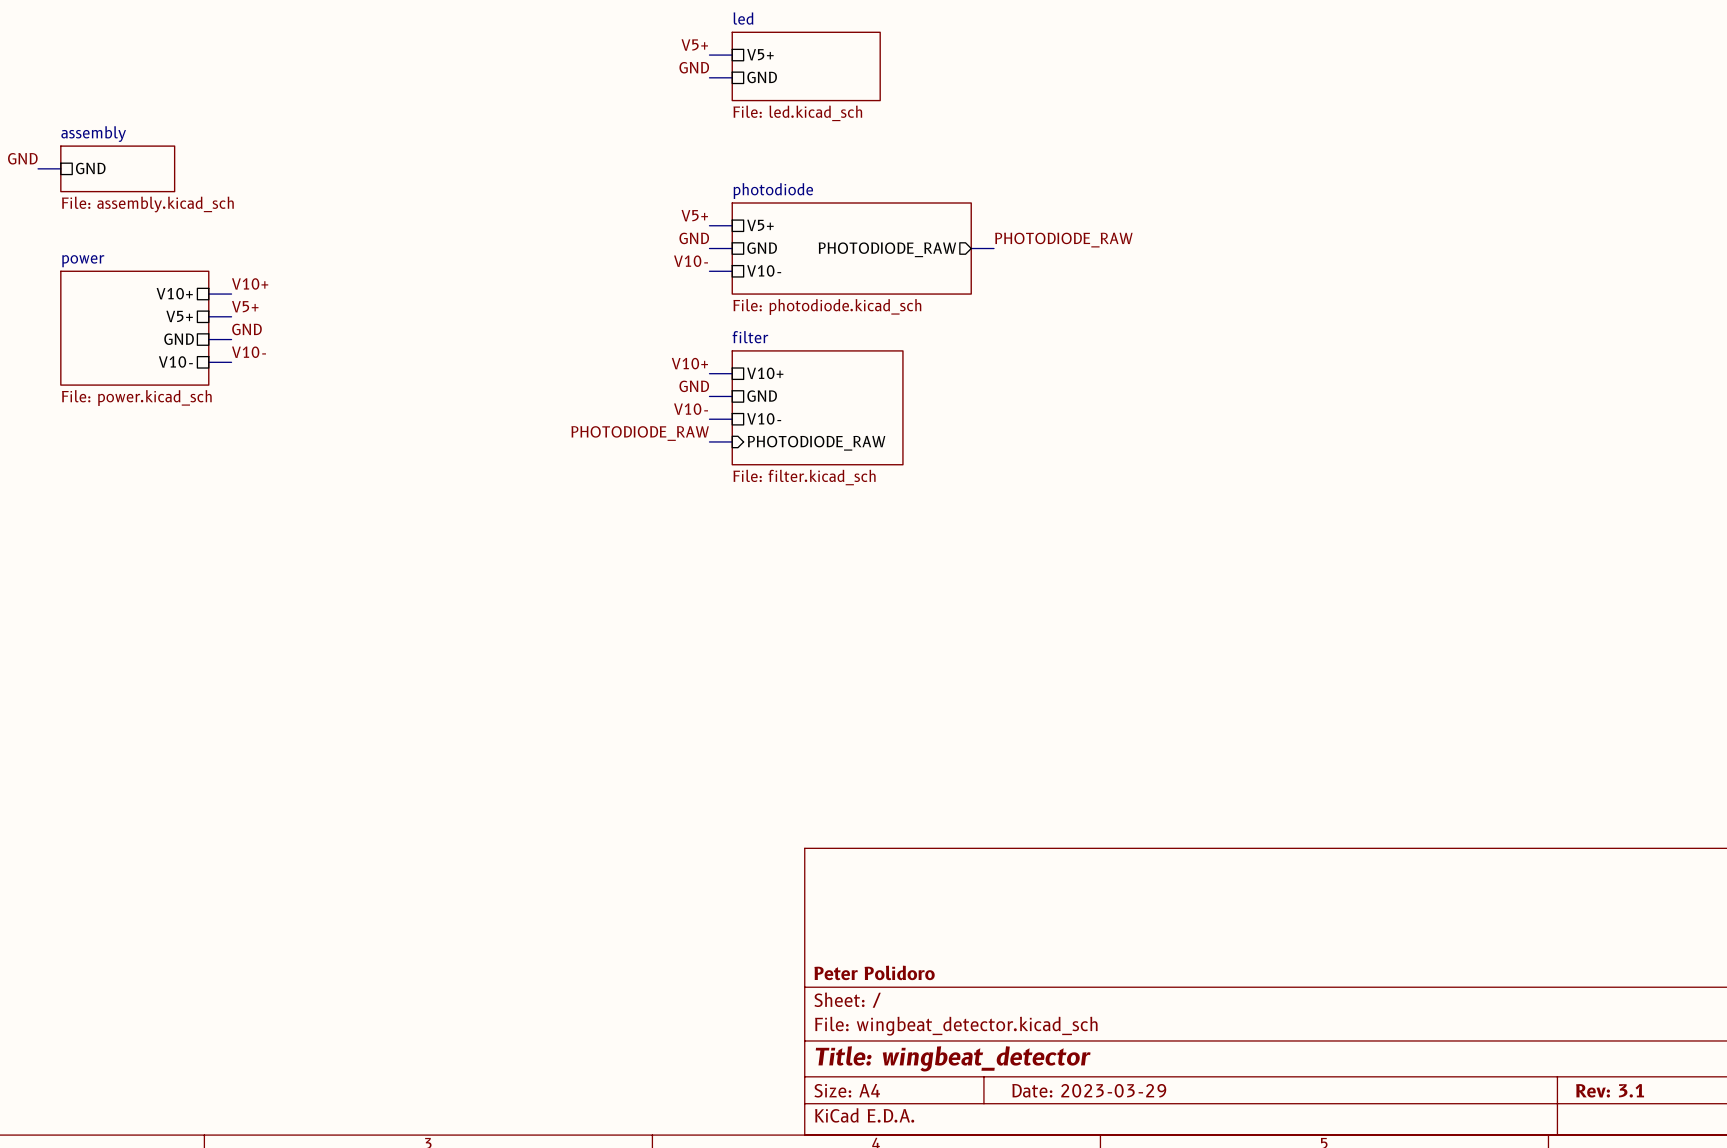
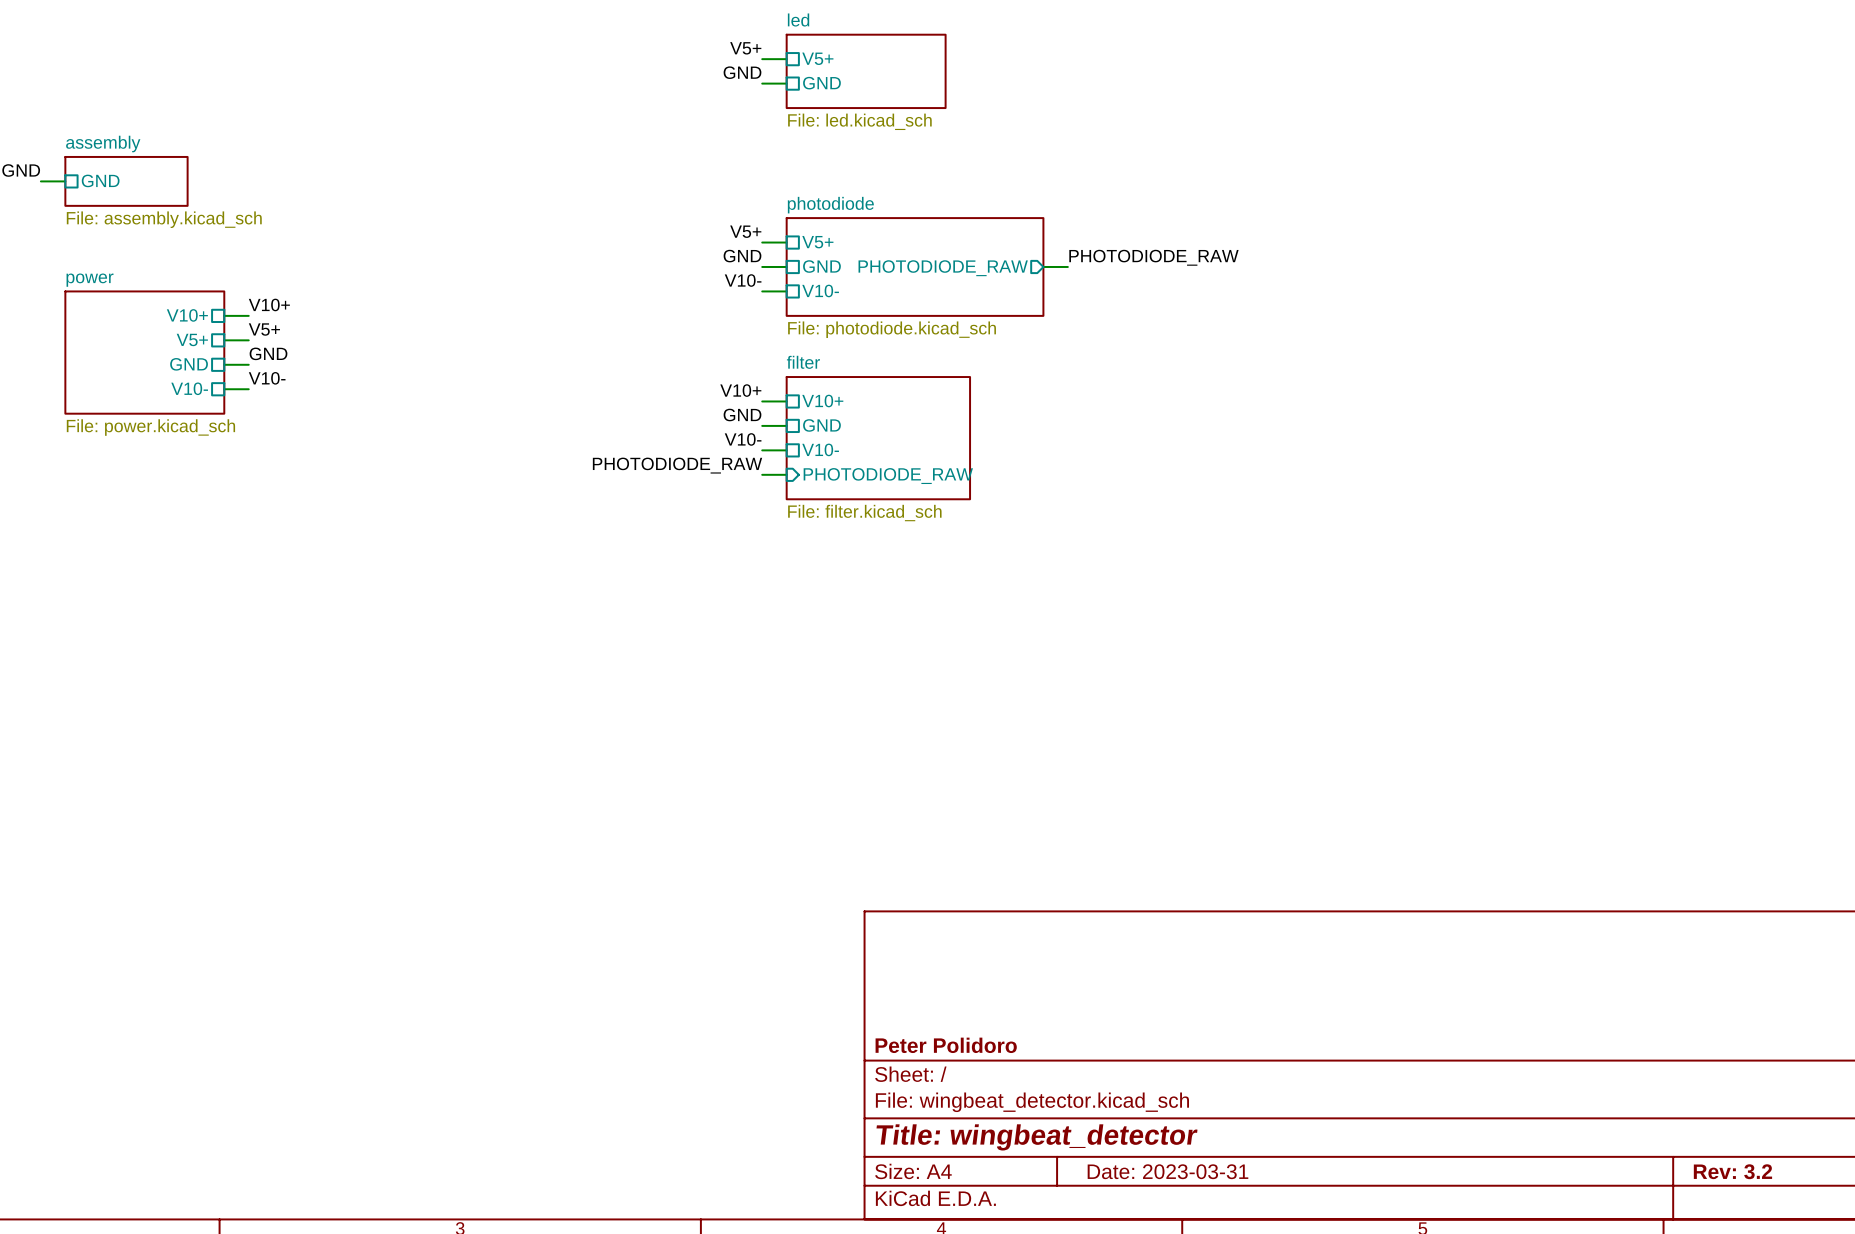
title block: Date: 2023-03-29 (1089, 1090) -> Date: 2023-03-31 (1167, 1171)
title block: Rev: 3.1 (1610, 1090) -> Rev: 3.2 (1732, 1171)

